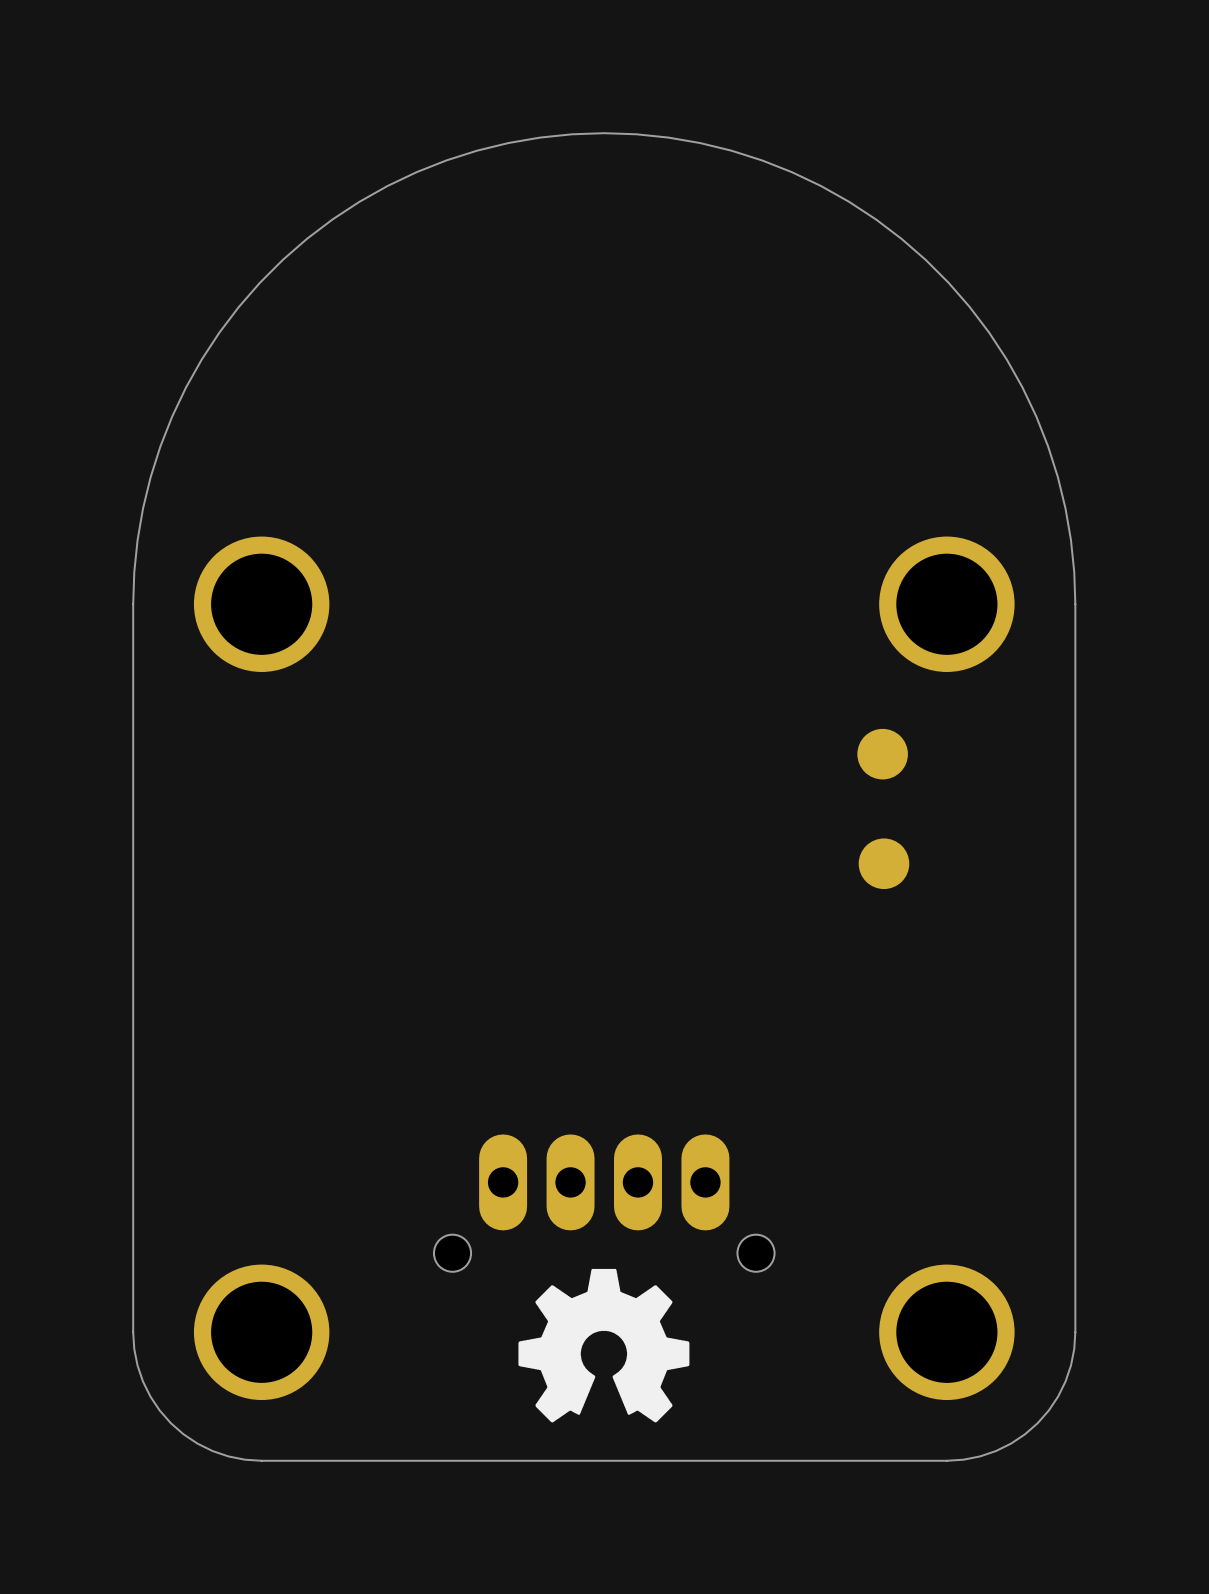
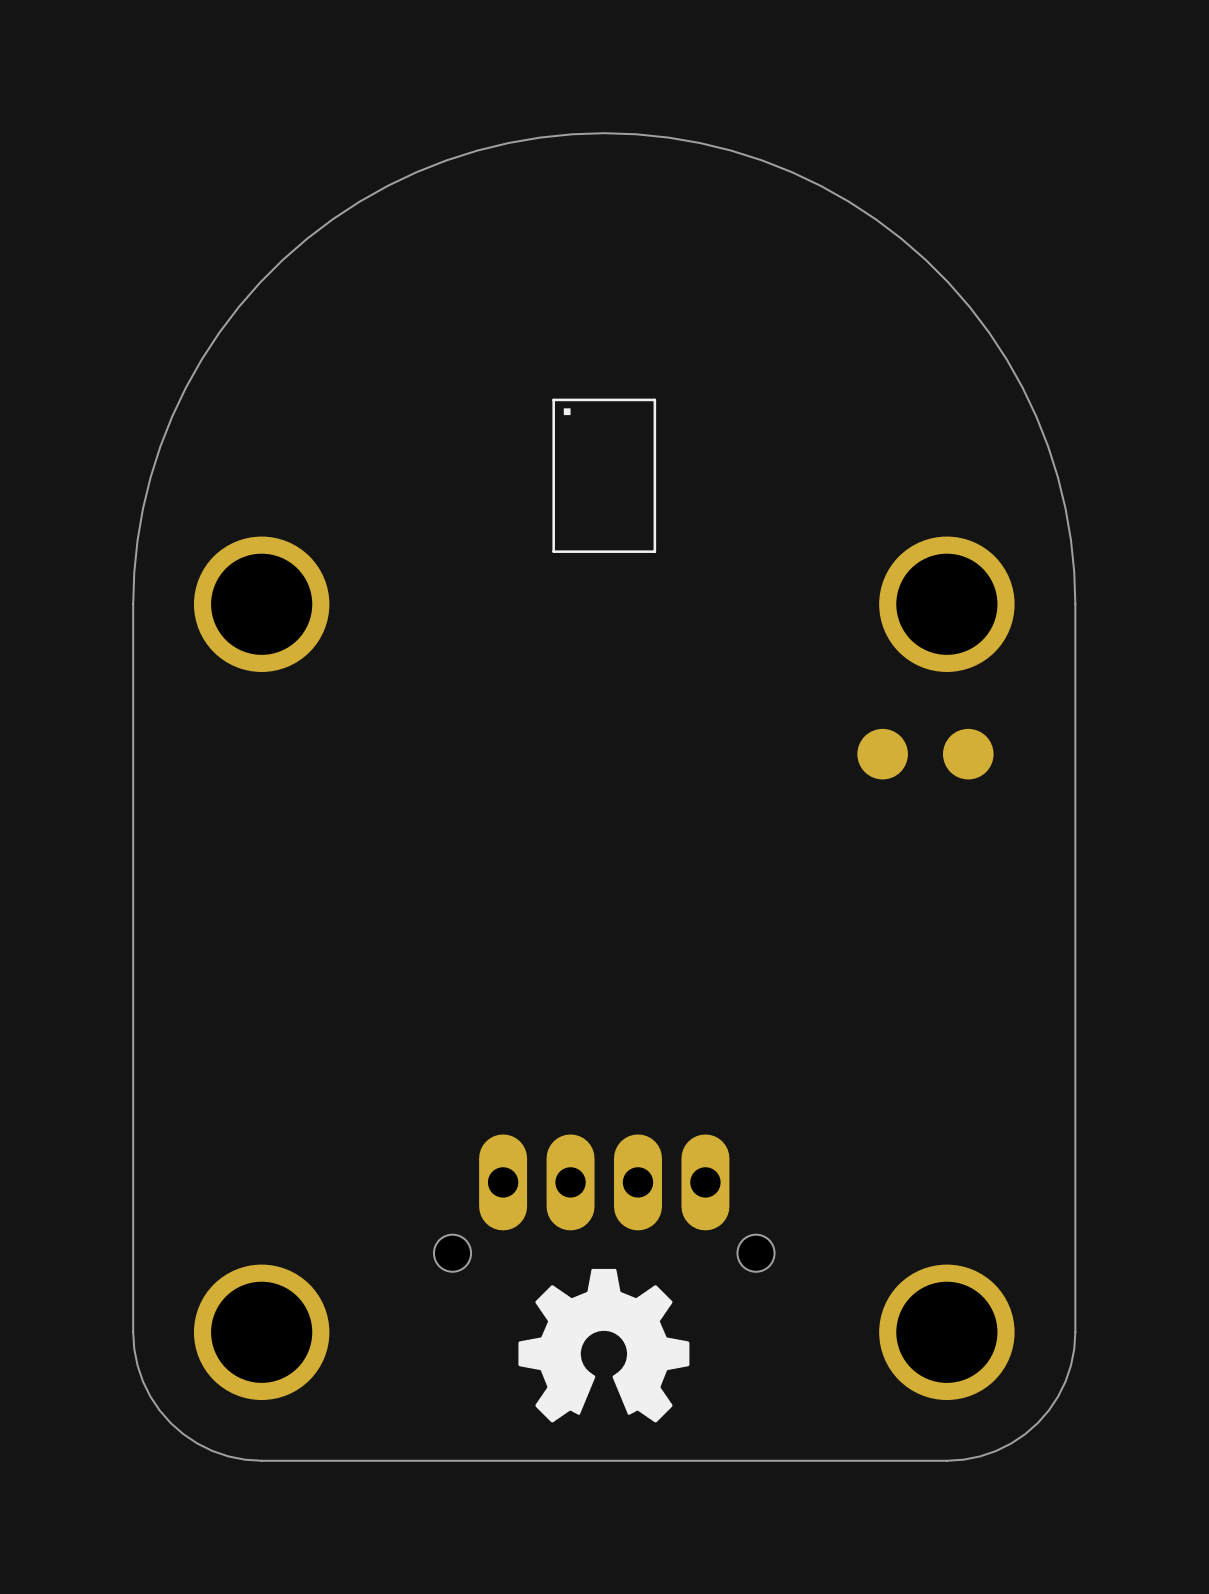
part: none -> (604, 475)
part position: (883, 863) -> (968, 754)

